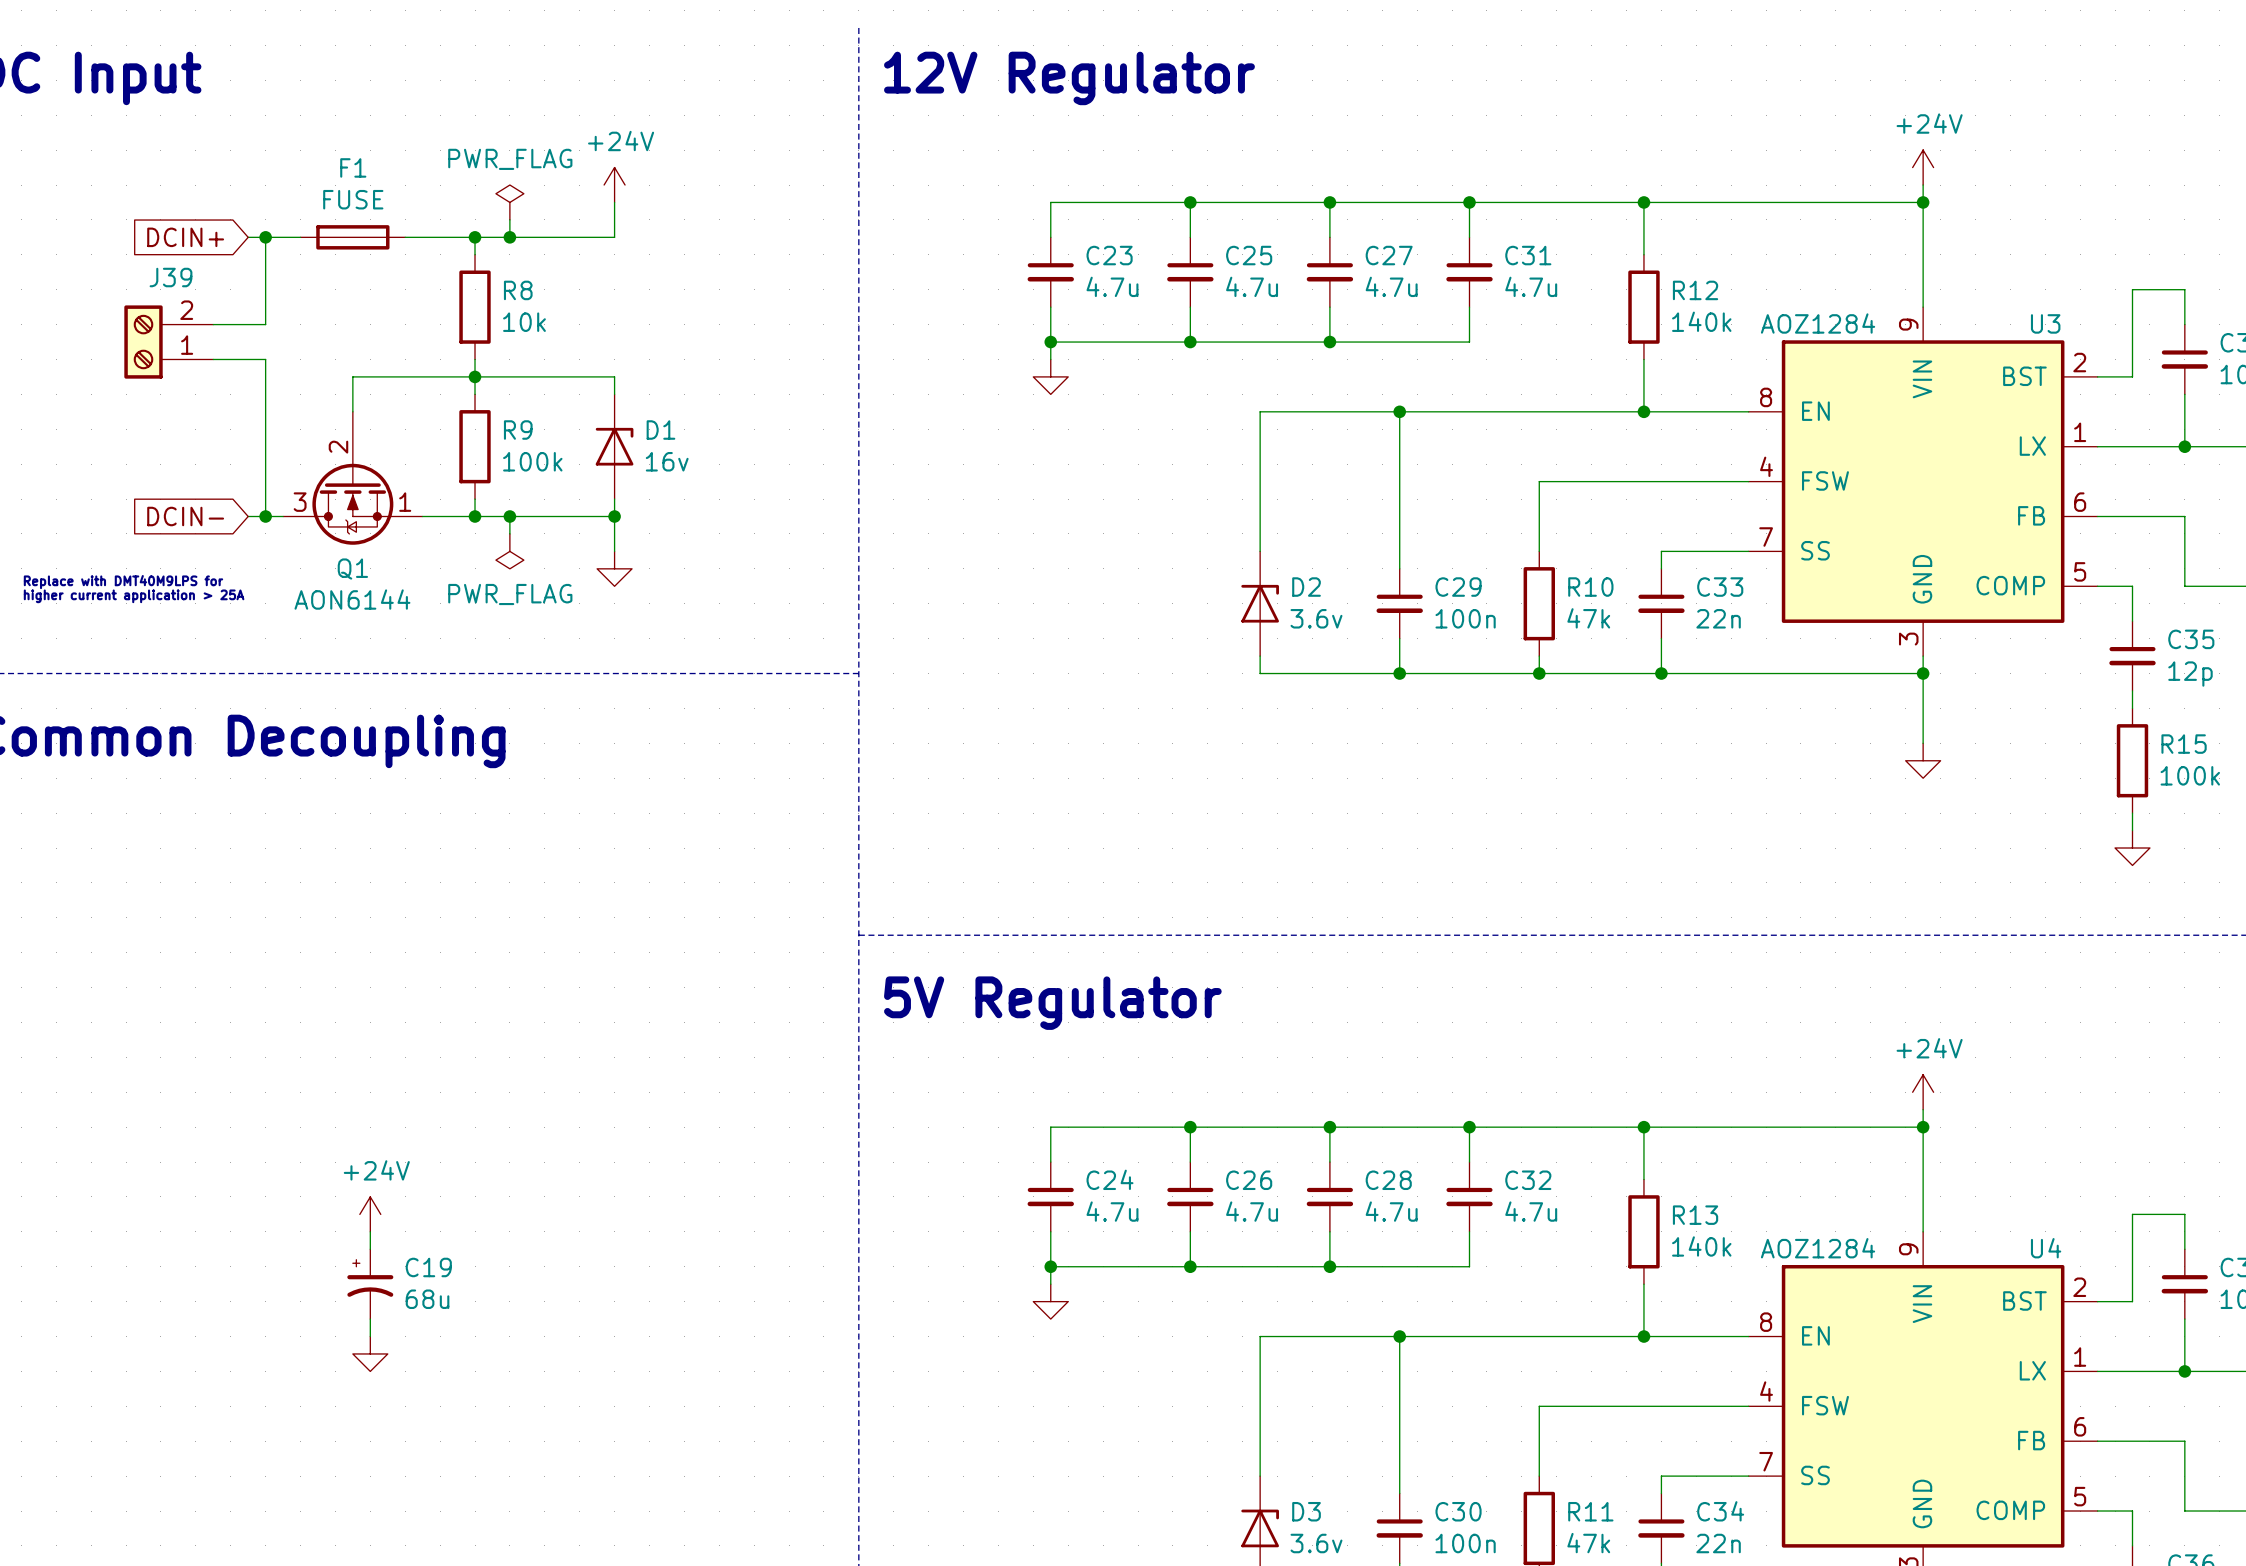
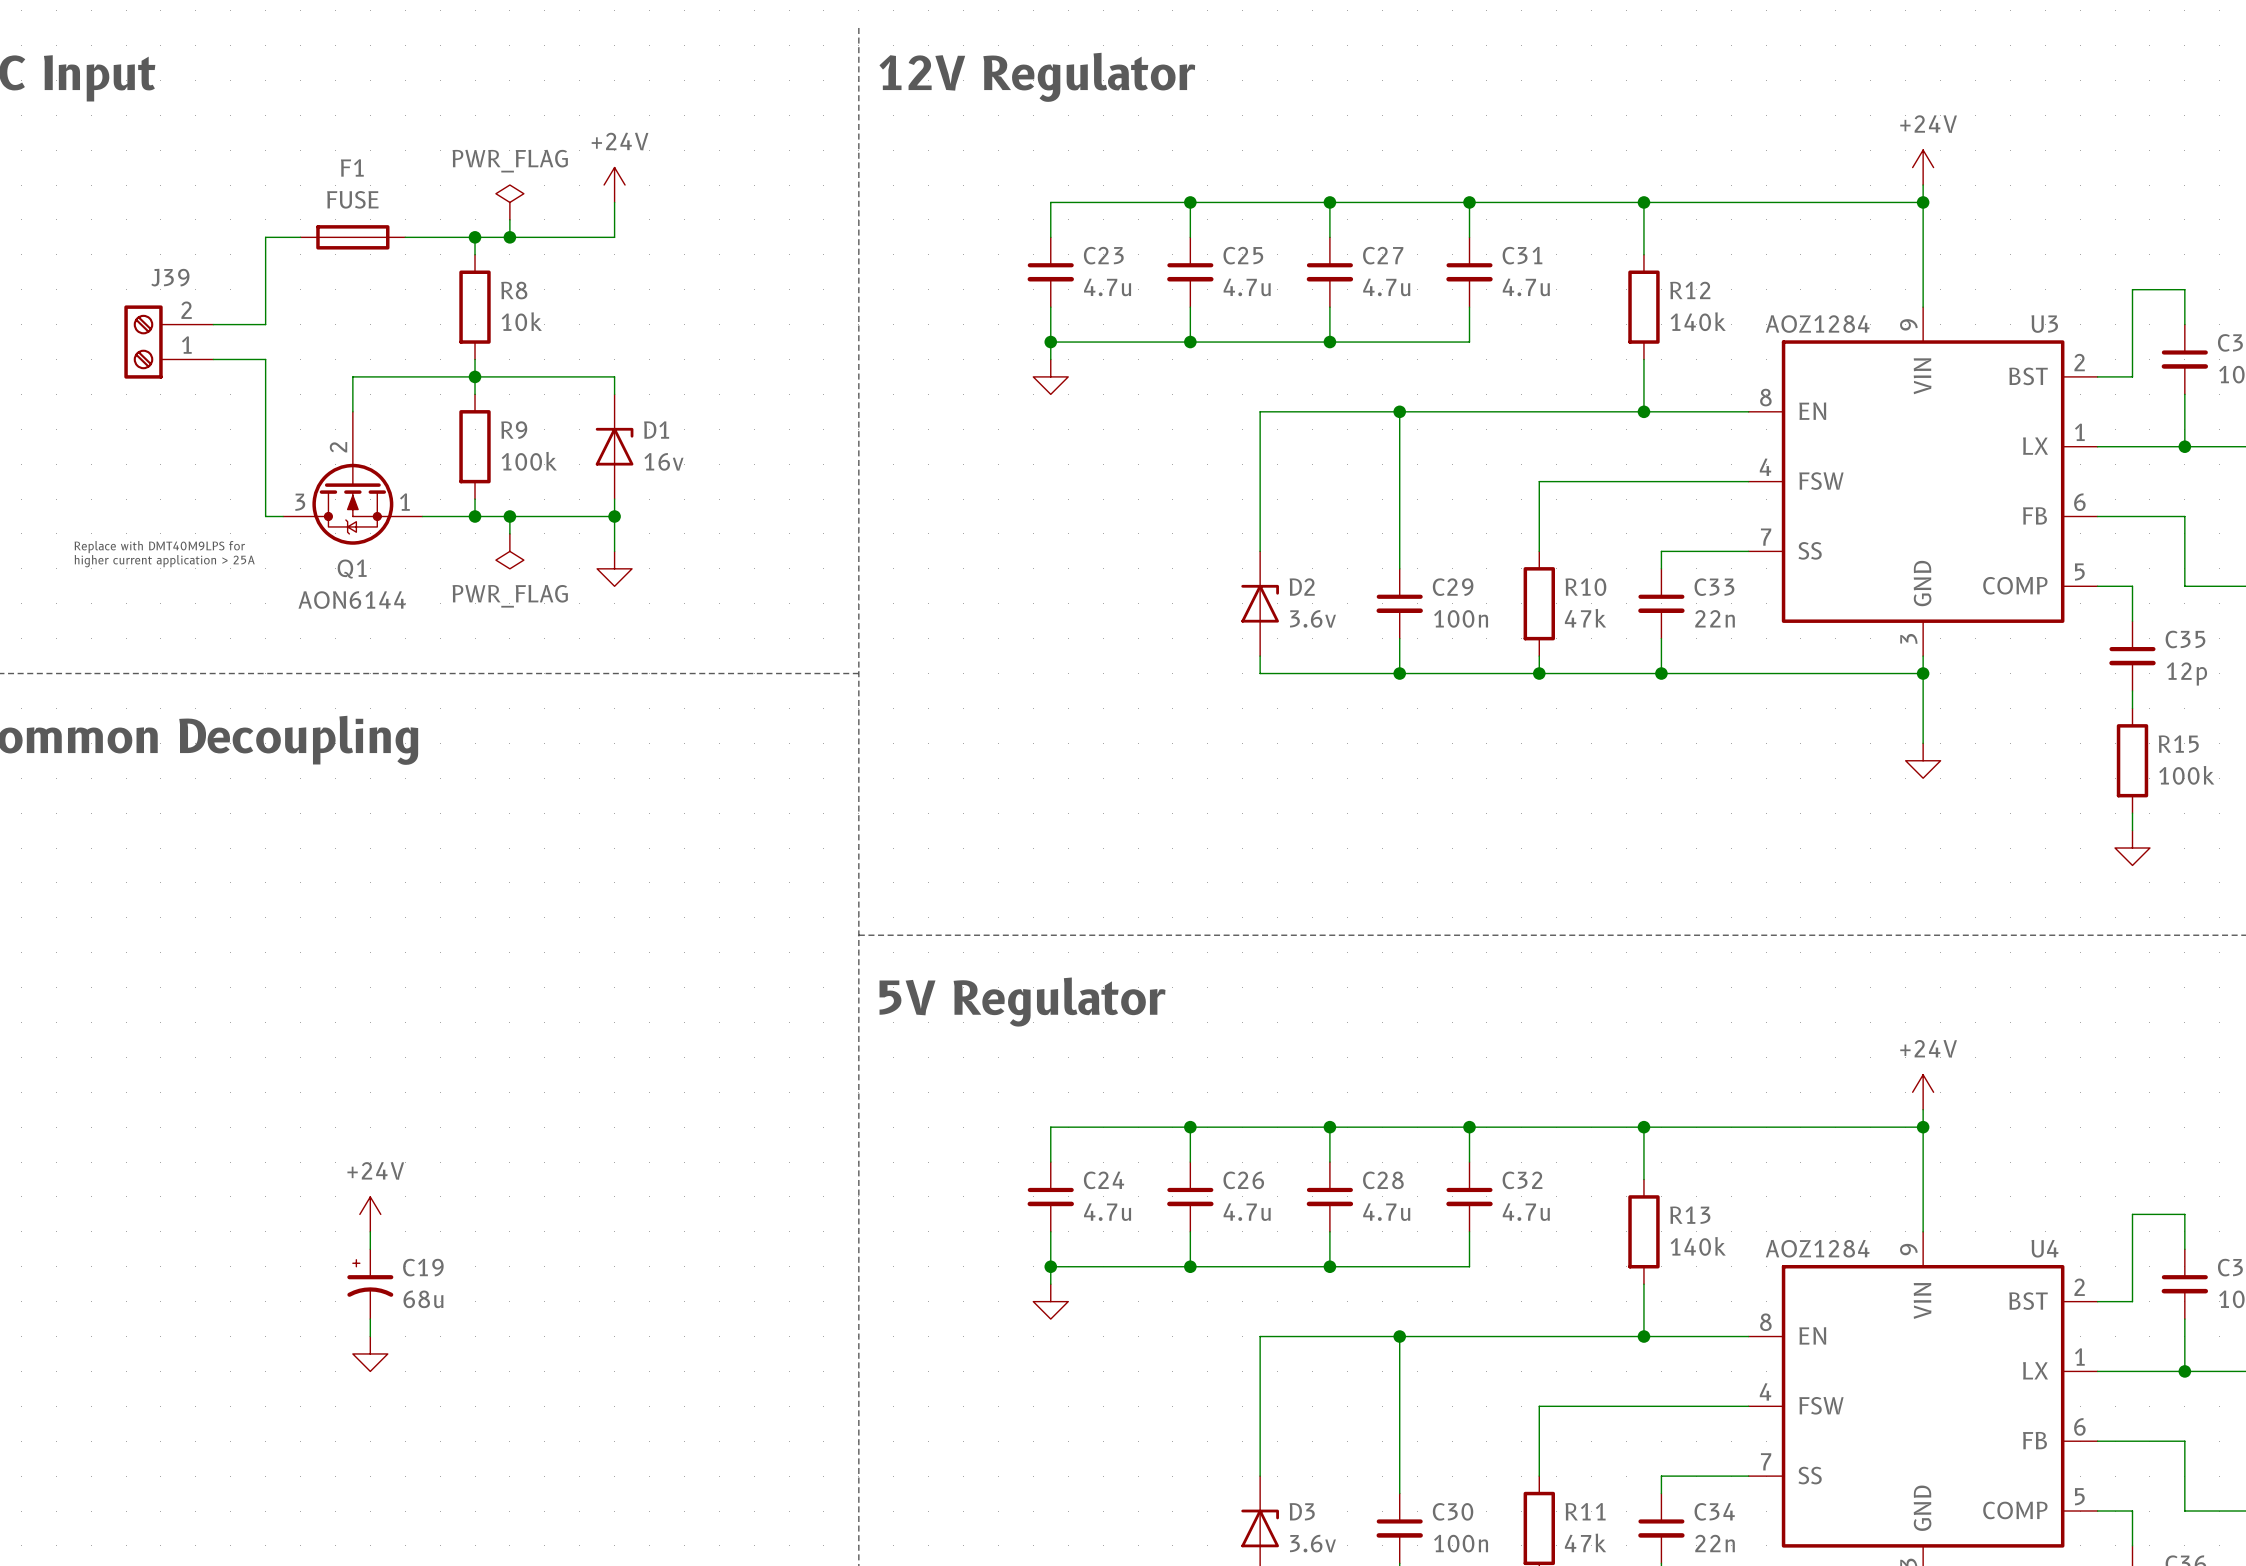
global label: DCIN+ (185, 237) -> none
wire: (248, 237) (265, 237) -> none
junction: (265, 237) -> none
global label: DCIN- (185, 516) -> none
wire: (248, 516) (265, 516) -> none
junction: (265, 516) -> none
text position: Replace with DMT40M9LPS for (123, 582) -> Replace with DMT40M9LPS for (159, 547)
text position: higher current application > 25A (134, 596) -> higher current application > 25A (164, 561)

